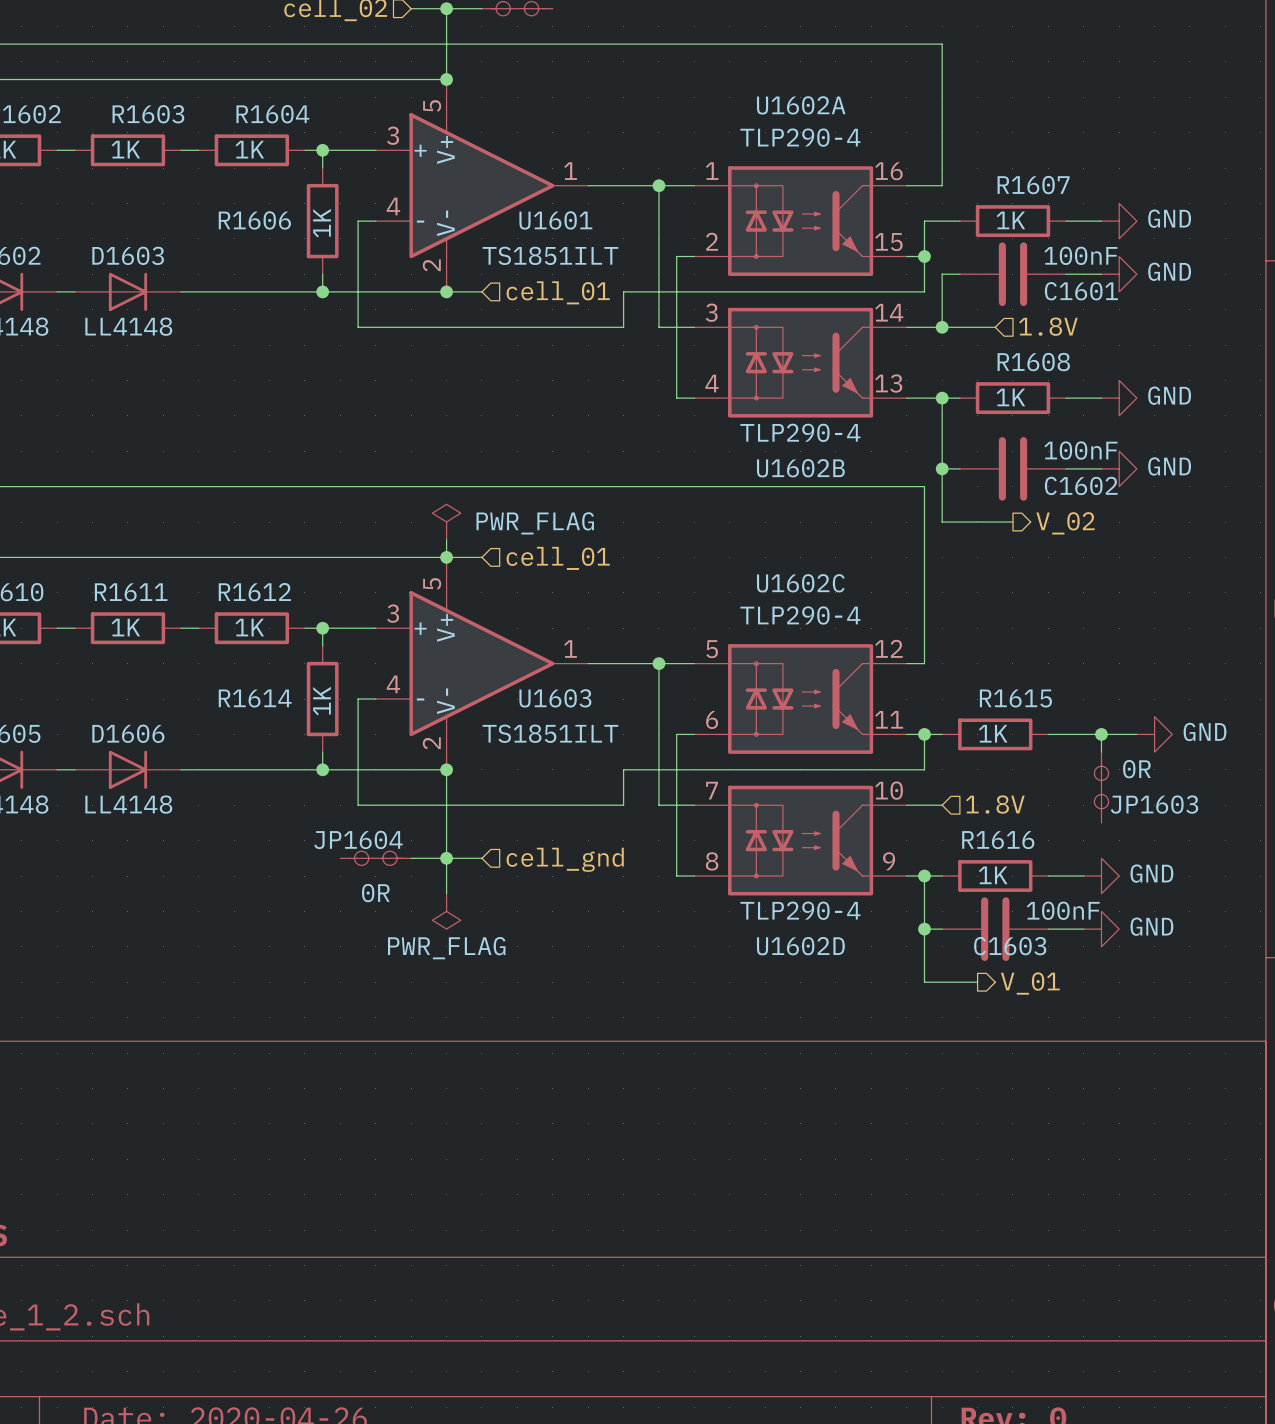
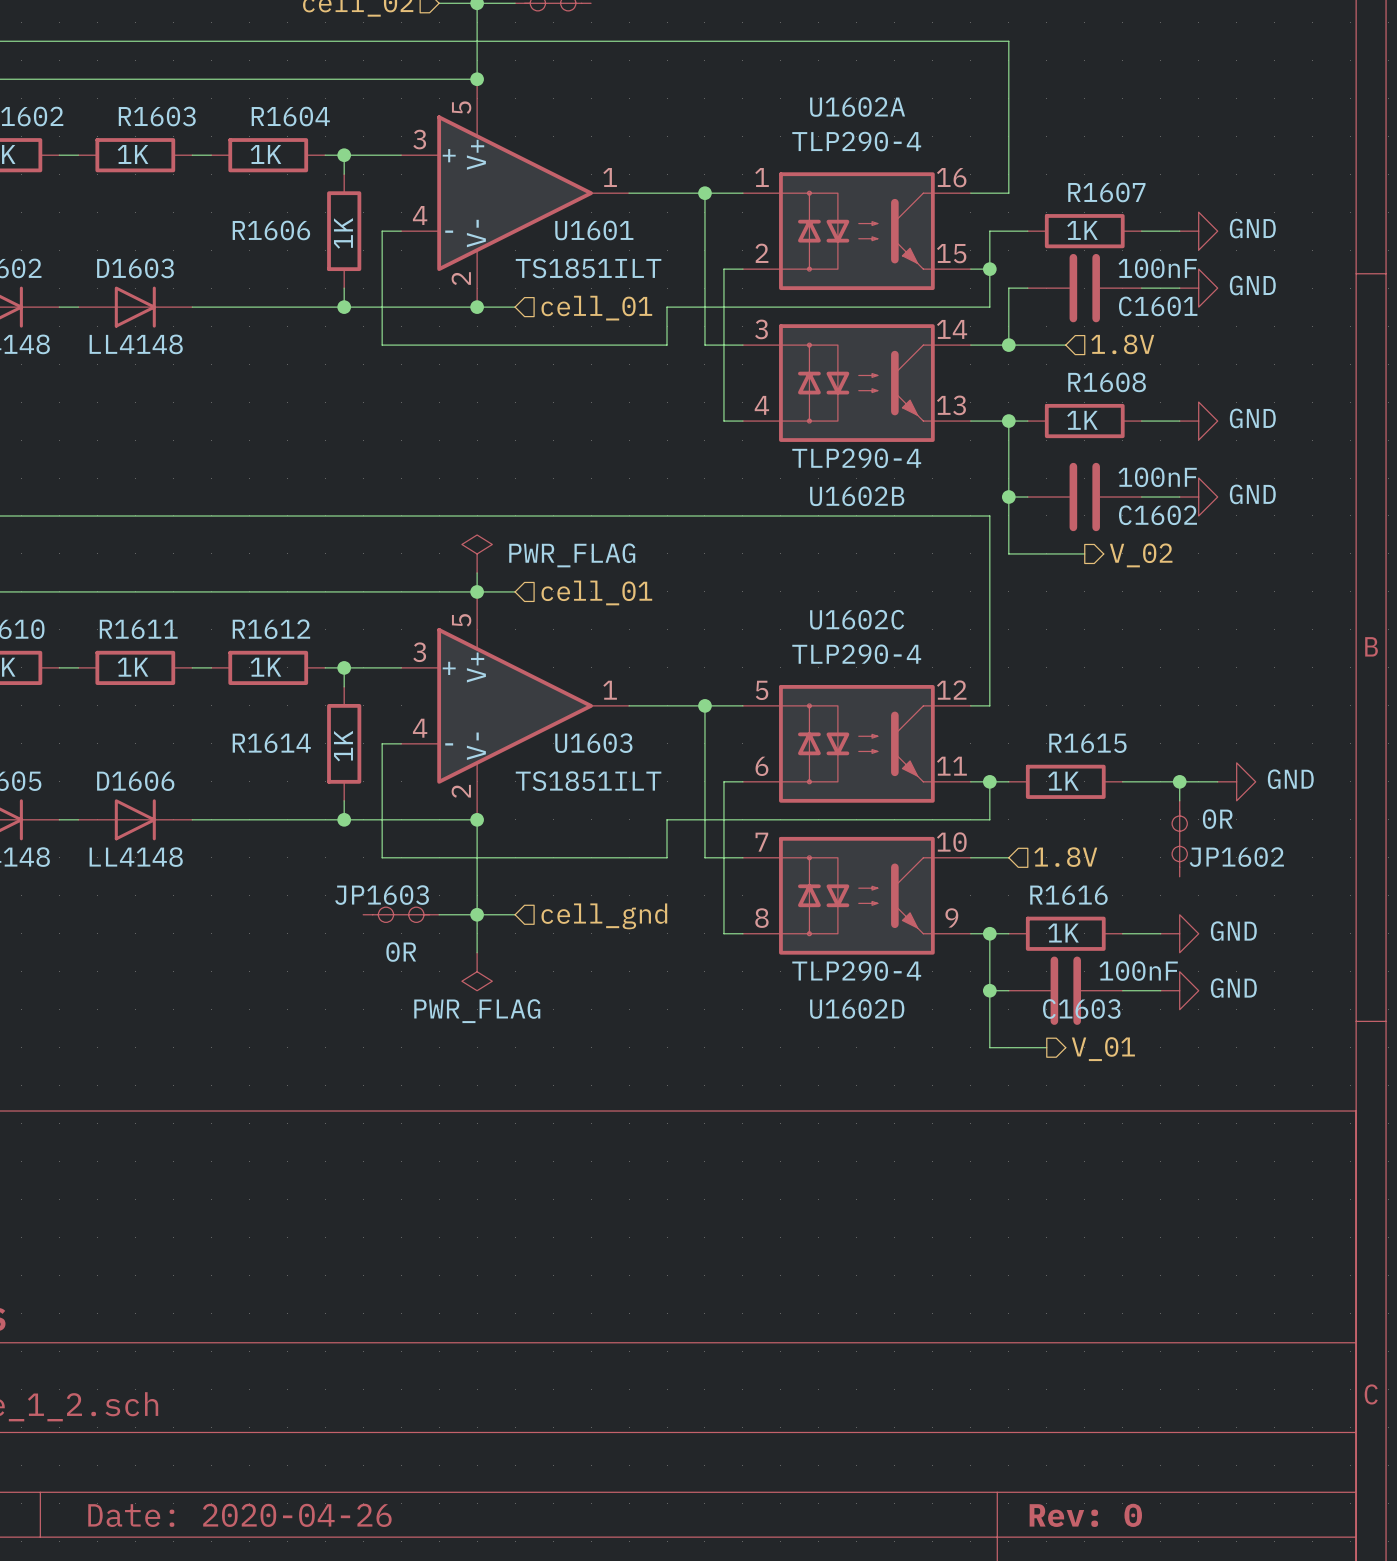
JP1603 name: JP1603 (1154, 804) -> JP1602 (1236, 857)
JP1604 name: JP1604 (358, 839) -> JP1603 (382, 895)

